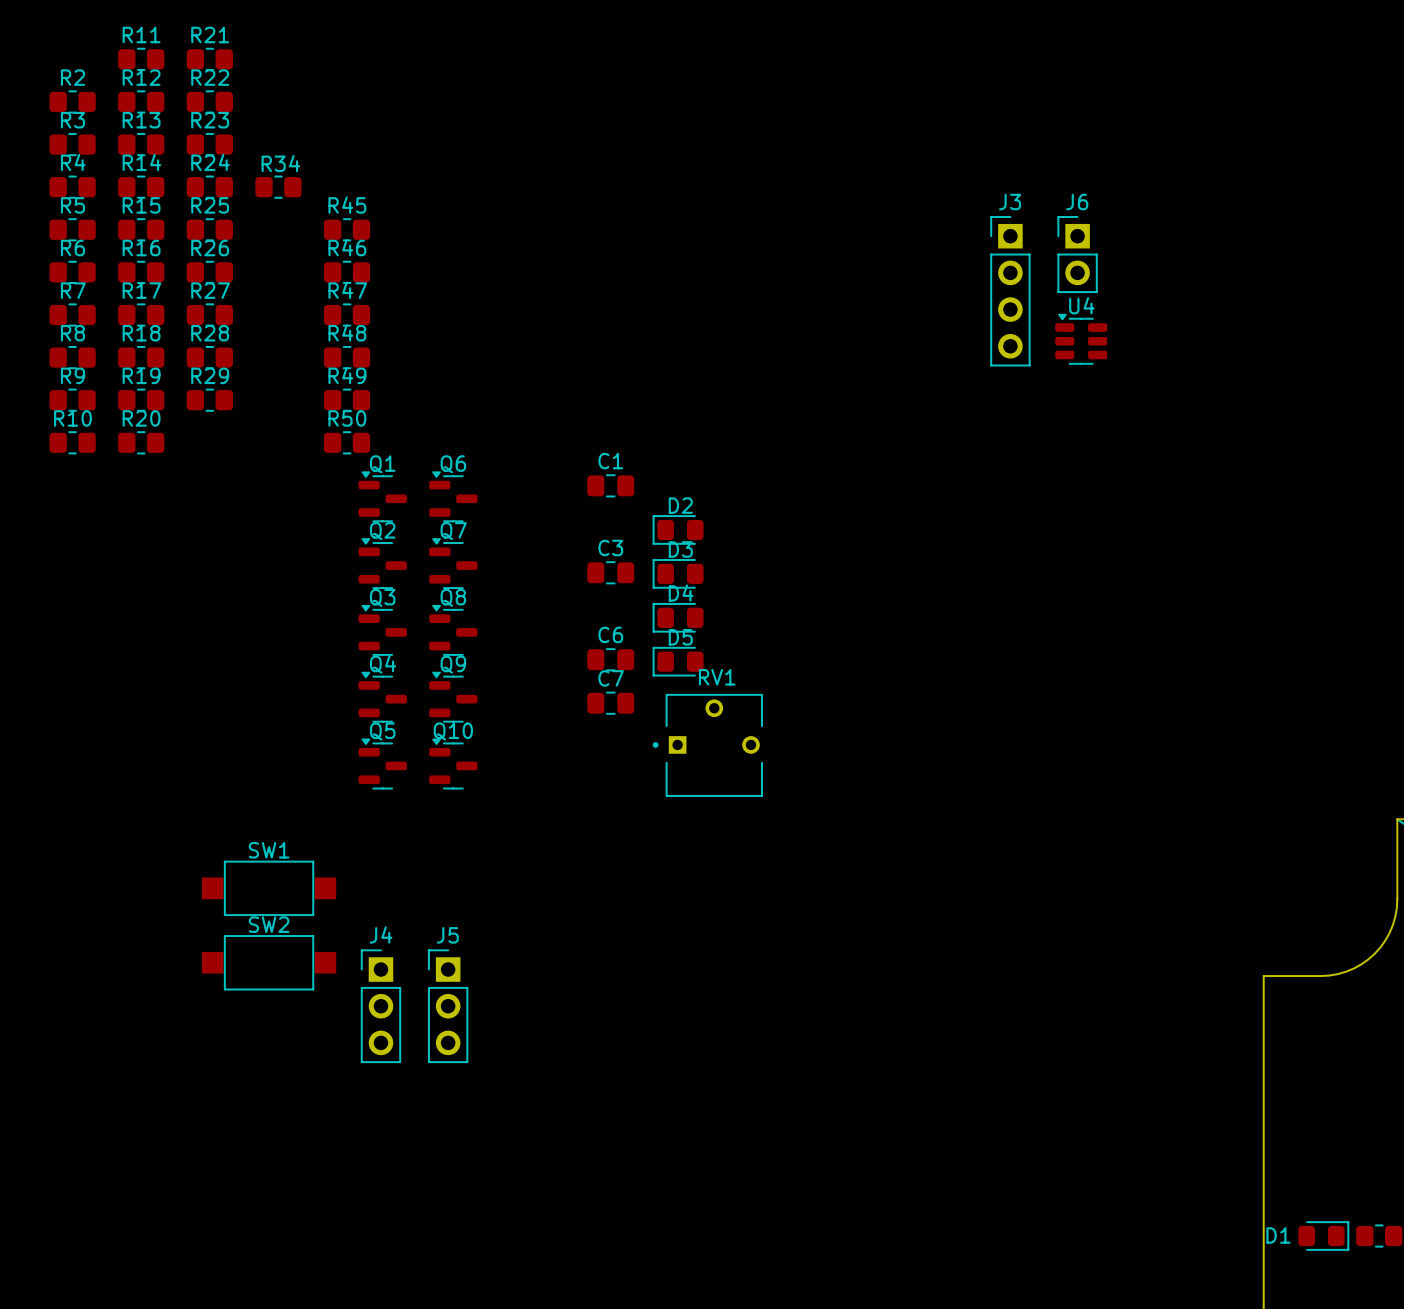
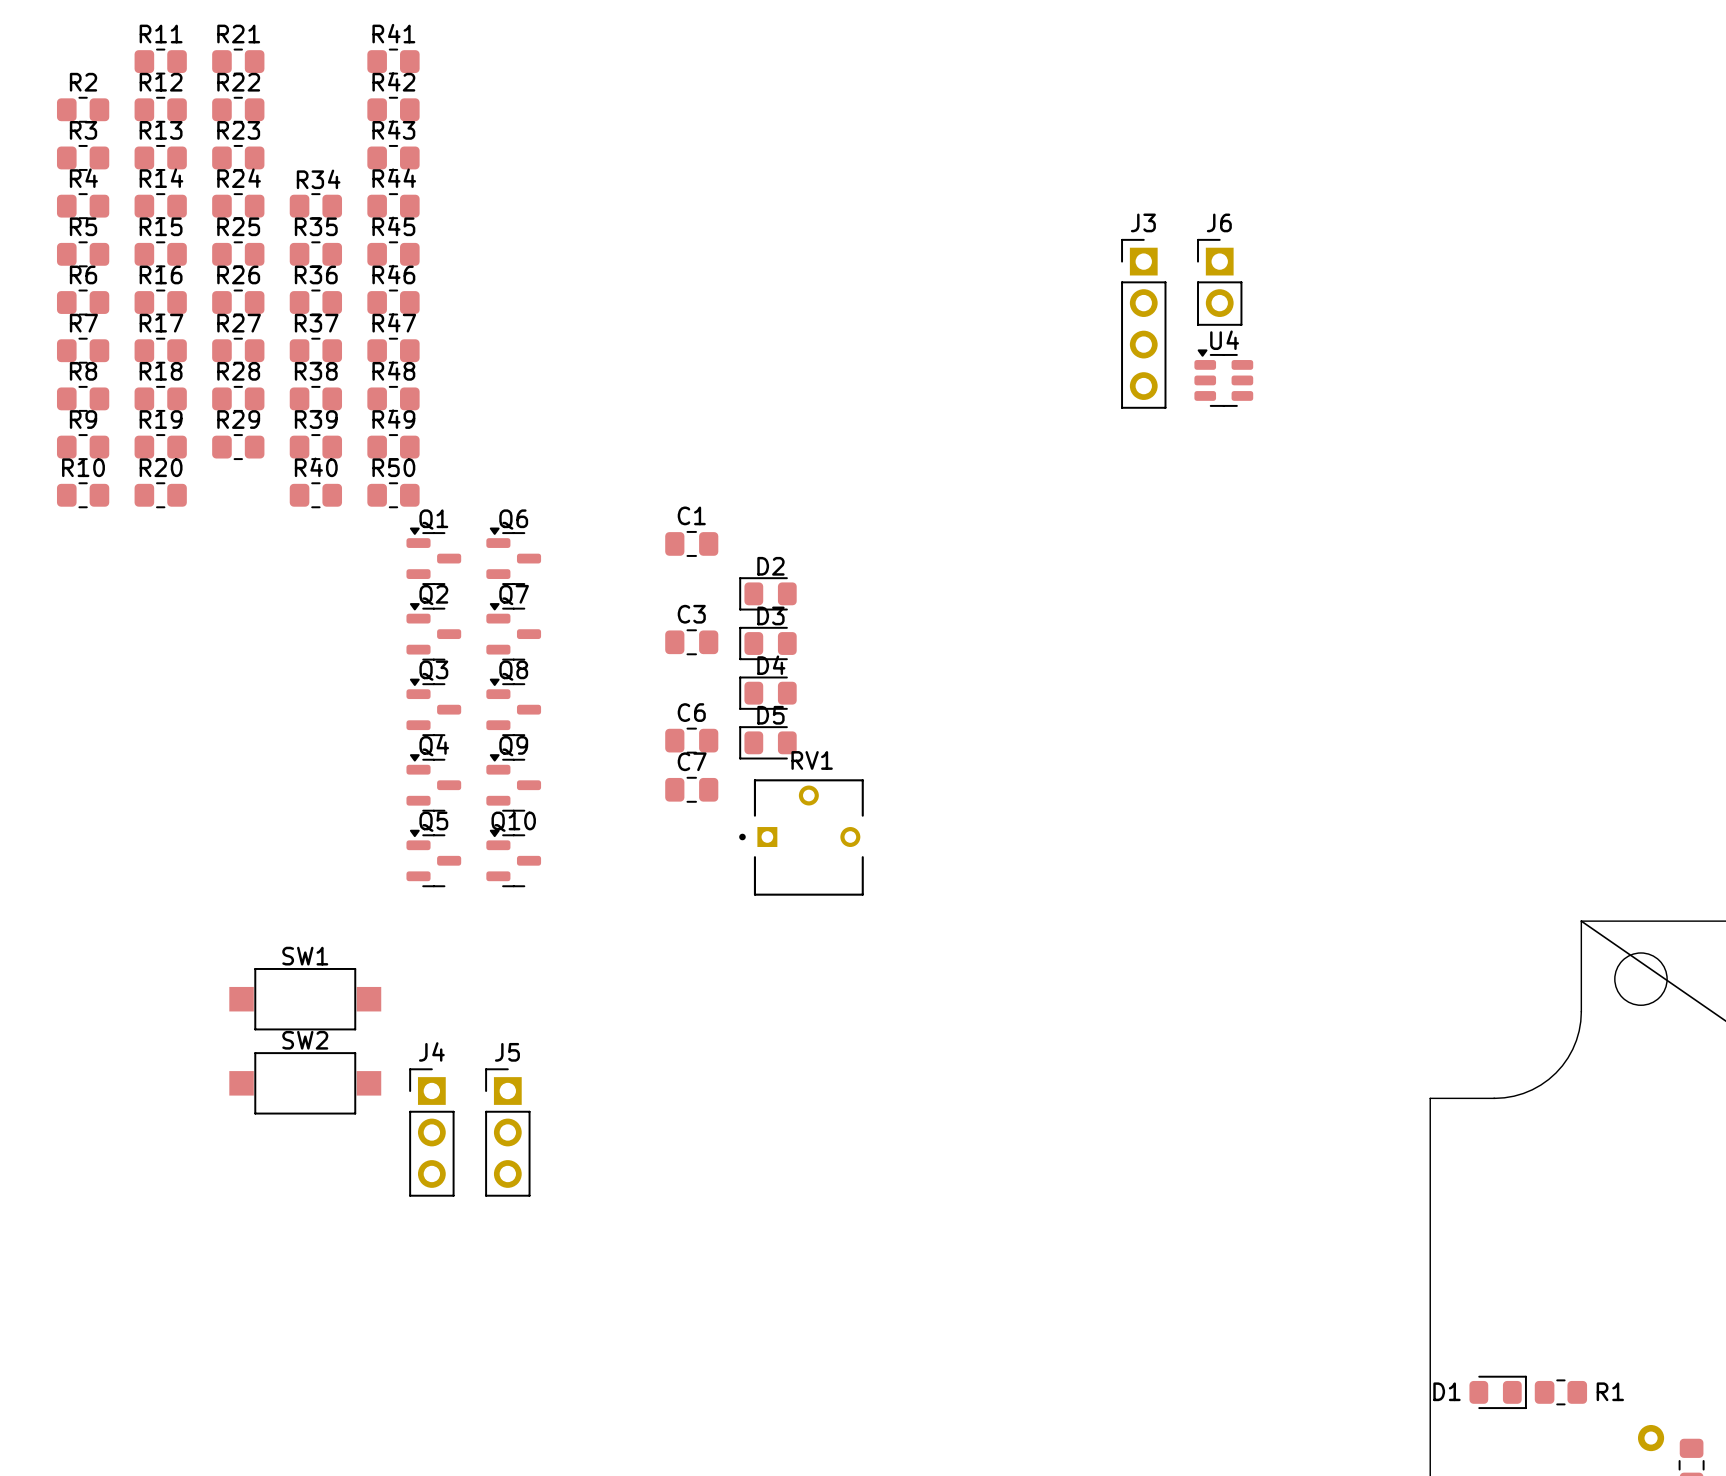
R41: none -> (393, 61)
R42: none -> (393, 109)
R43: none -> (393, 157)
R44: none -> (393, 206)
R35: none -> (315, 254)
R36: none -> (315, 302)
R37: none -> (315, 350)
R38: none -> (315, 398)
R39: none -> (315, 447)
R40: none -> (315, 495)

